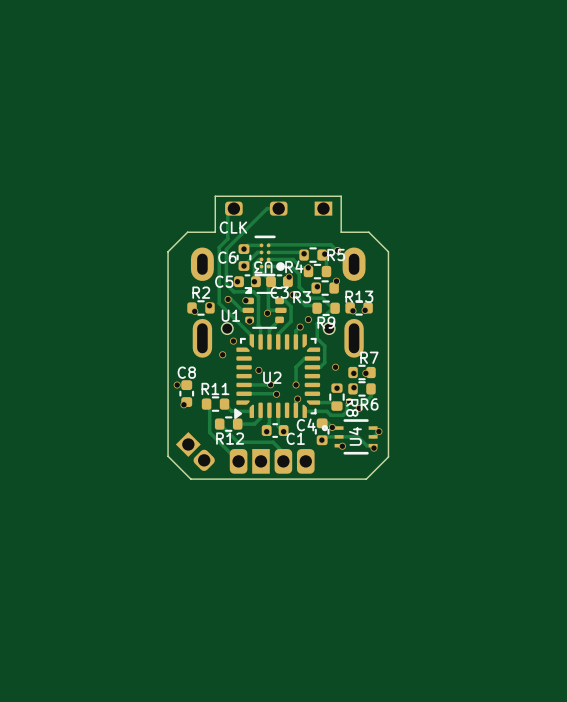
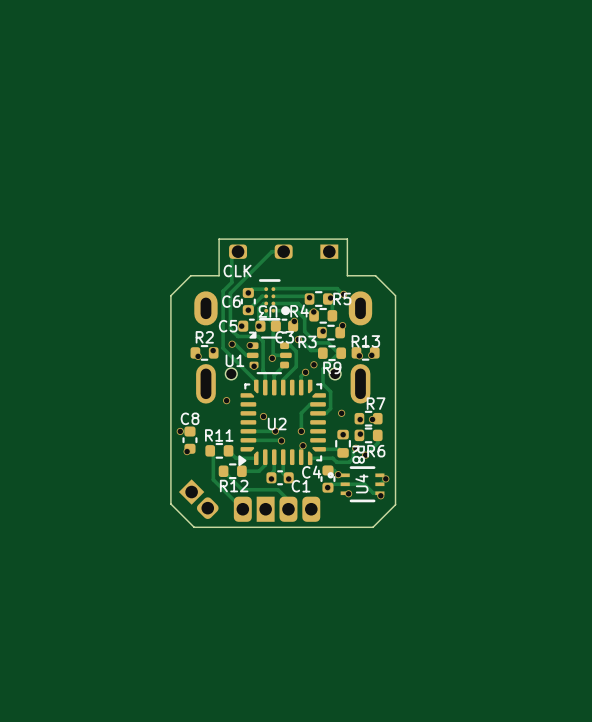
via: (233, 341) -> none

